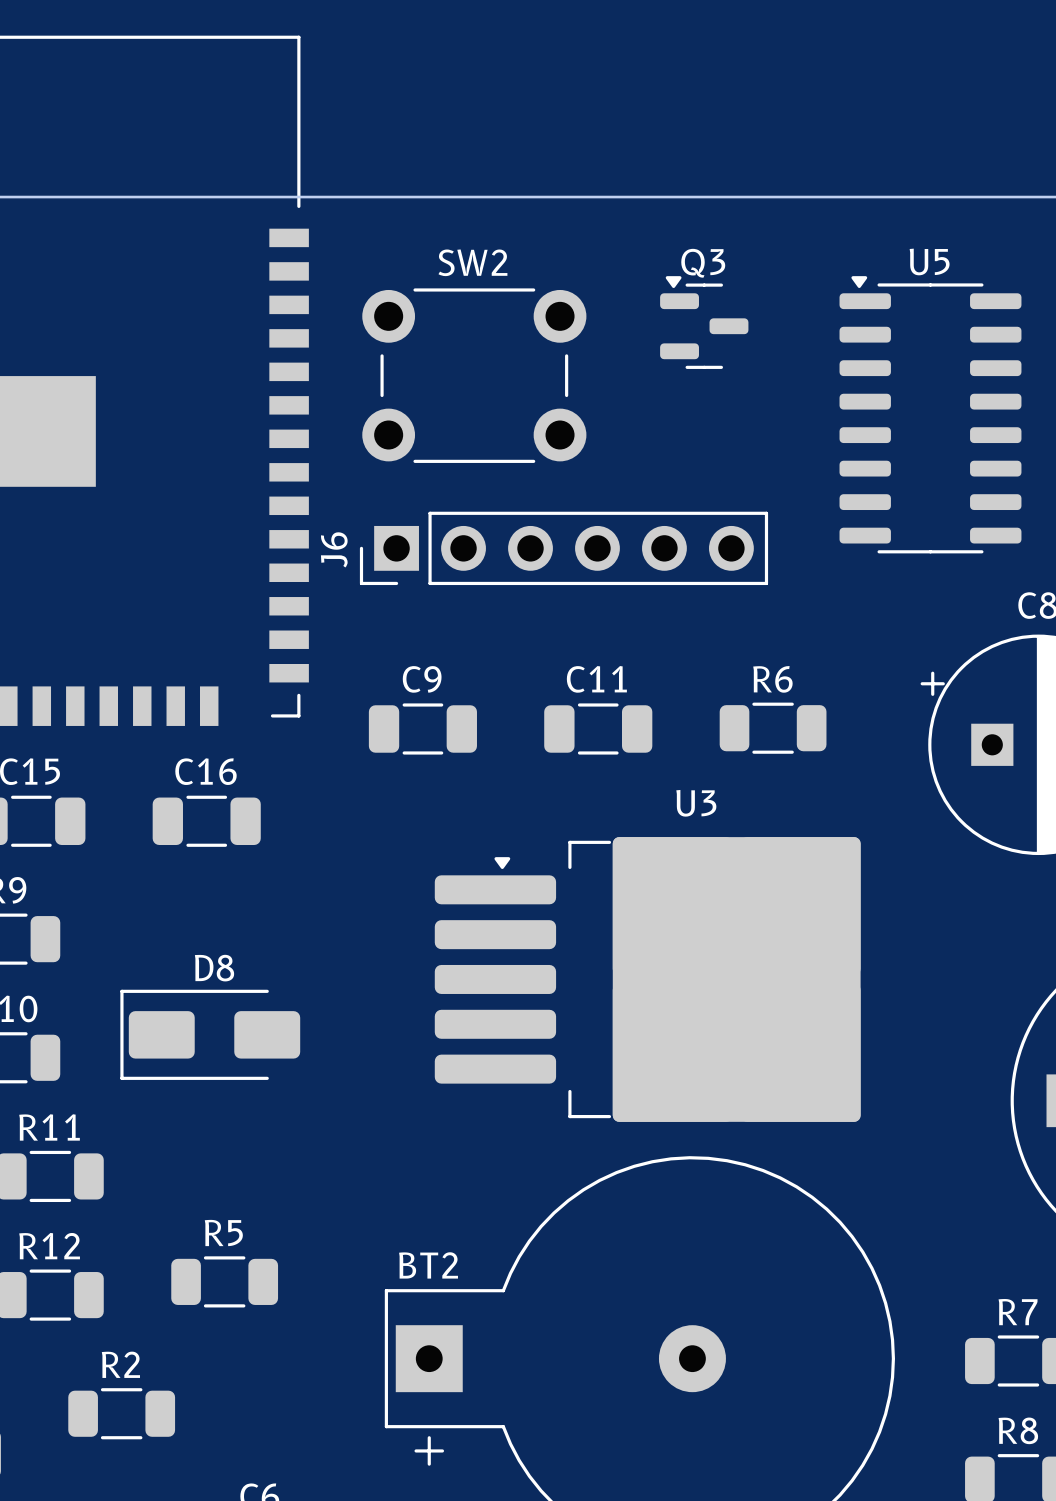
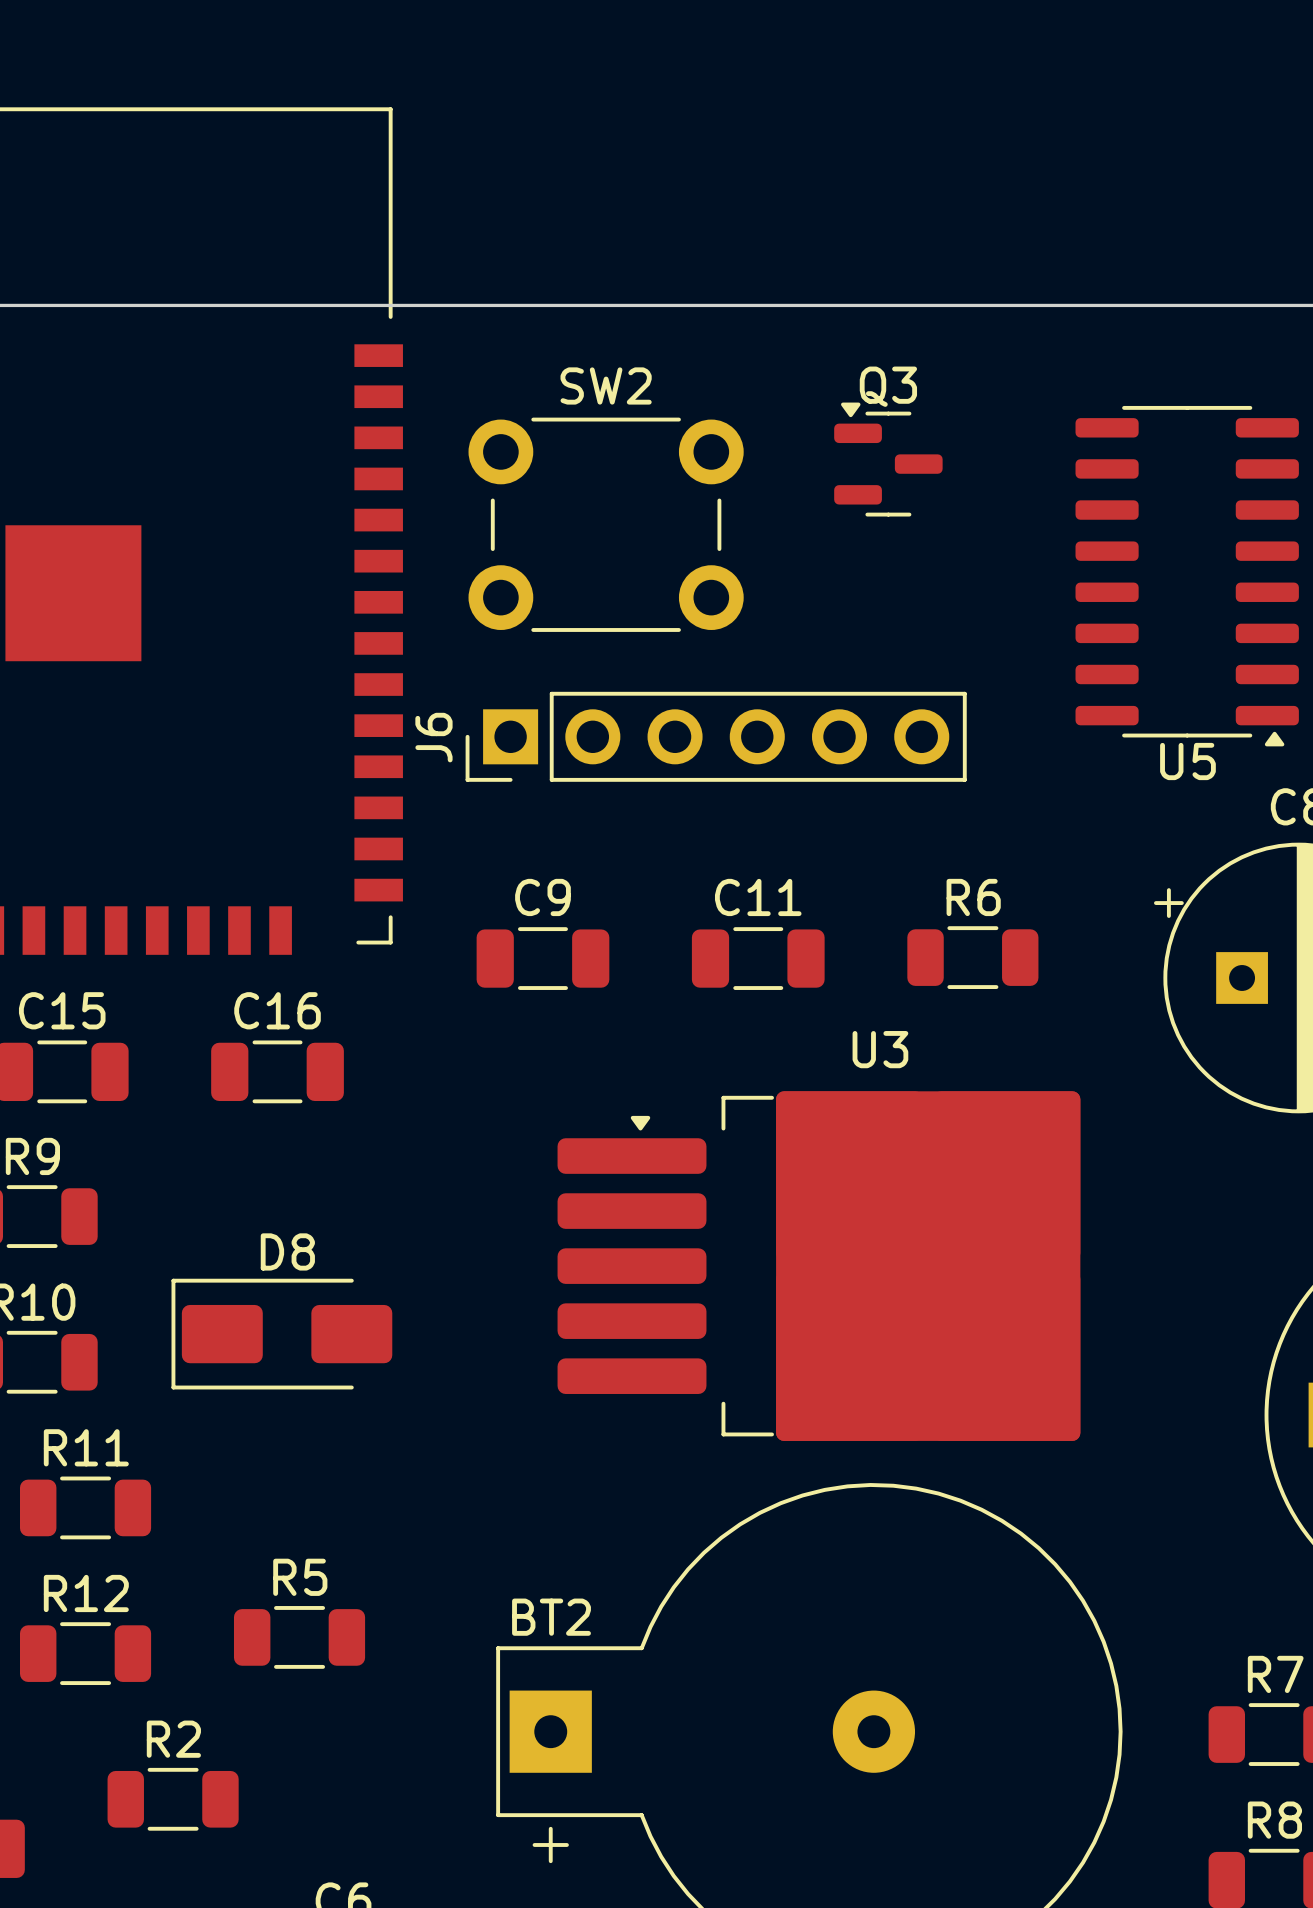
U5 rotation: 0° (930, 414) -> 180° (1187, 576)

